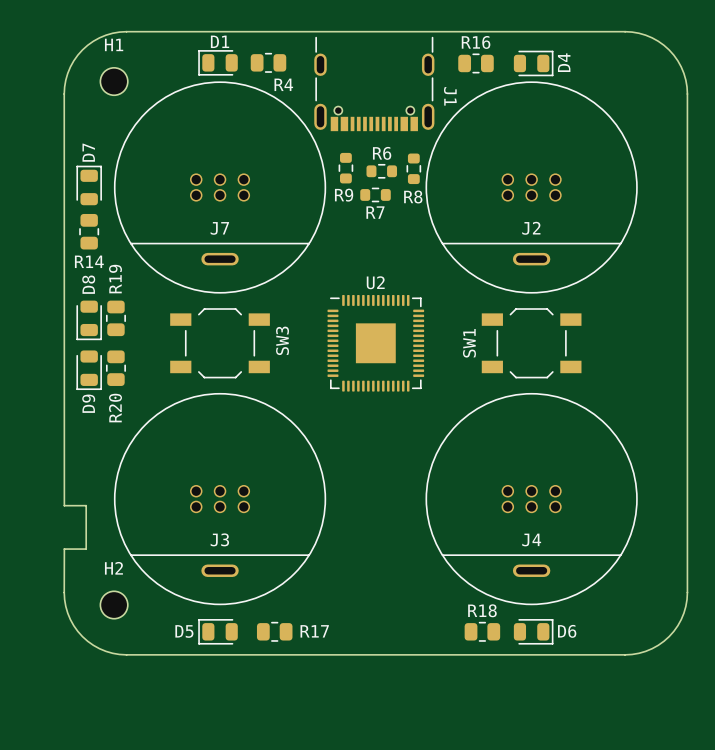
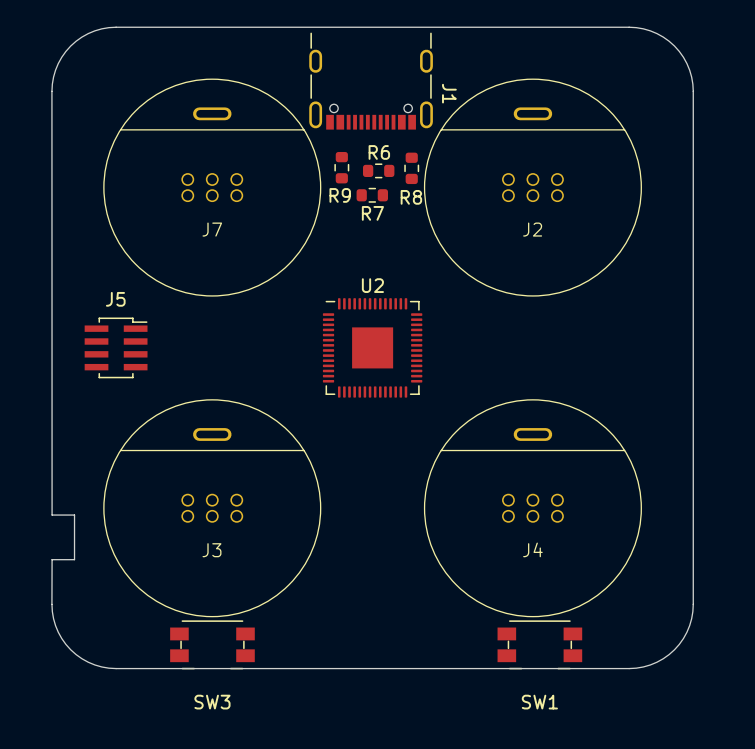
D1: (218, 62) -> none
R4: (268, 62) -> none
R16: (476, 63) -> none
D4: (533, 63) -> none
H1: (114, 81) -> none
D7: (89, 185) -> none
J7 rotation: 0° (220, 187) -> 180° (212, 187)
J2 rotation: 0° (531, 187) -> 180° (532, 187)
R14: (89, 231) -> none
SW3 footprint: [170, 308, 270, 379] -> [170, 620, 255, 670]
SW1 footprint: [481, 308, 582, 379] -> [497, 620, 583, 670]
R19: (115, 318) -> none
D8: (89, 320) -> none
SW3 name position: SW3 (282, 340) -> SW3 (212, 702)
J5: none -> (116, 347)
SW1 name position: SW1 (469, 343) -> SW1 (539, 702)
R20: (115, 368) -> none
D9: (89, 370) -> none
J3 rotation: 0° (220, 499) -> 180° (212, 508)
J4 rotation: 0° (531, 499) -> 180° (532, 508)
H2: (114, 605) -> none
D5: (218, 631) -> none
R17: (274, 631) -> none
R18: (482, 631) -> none
D6: (533, 631) -> none

